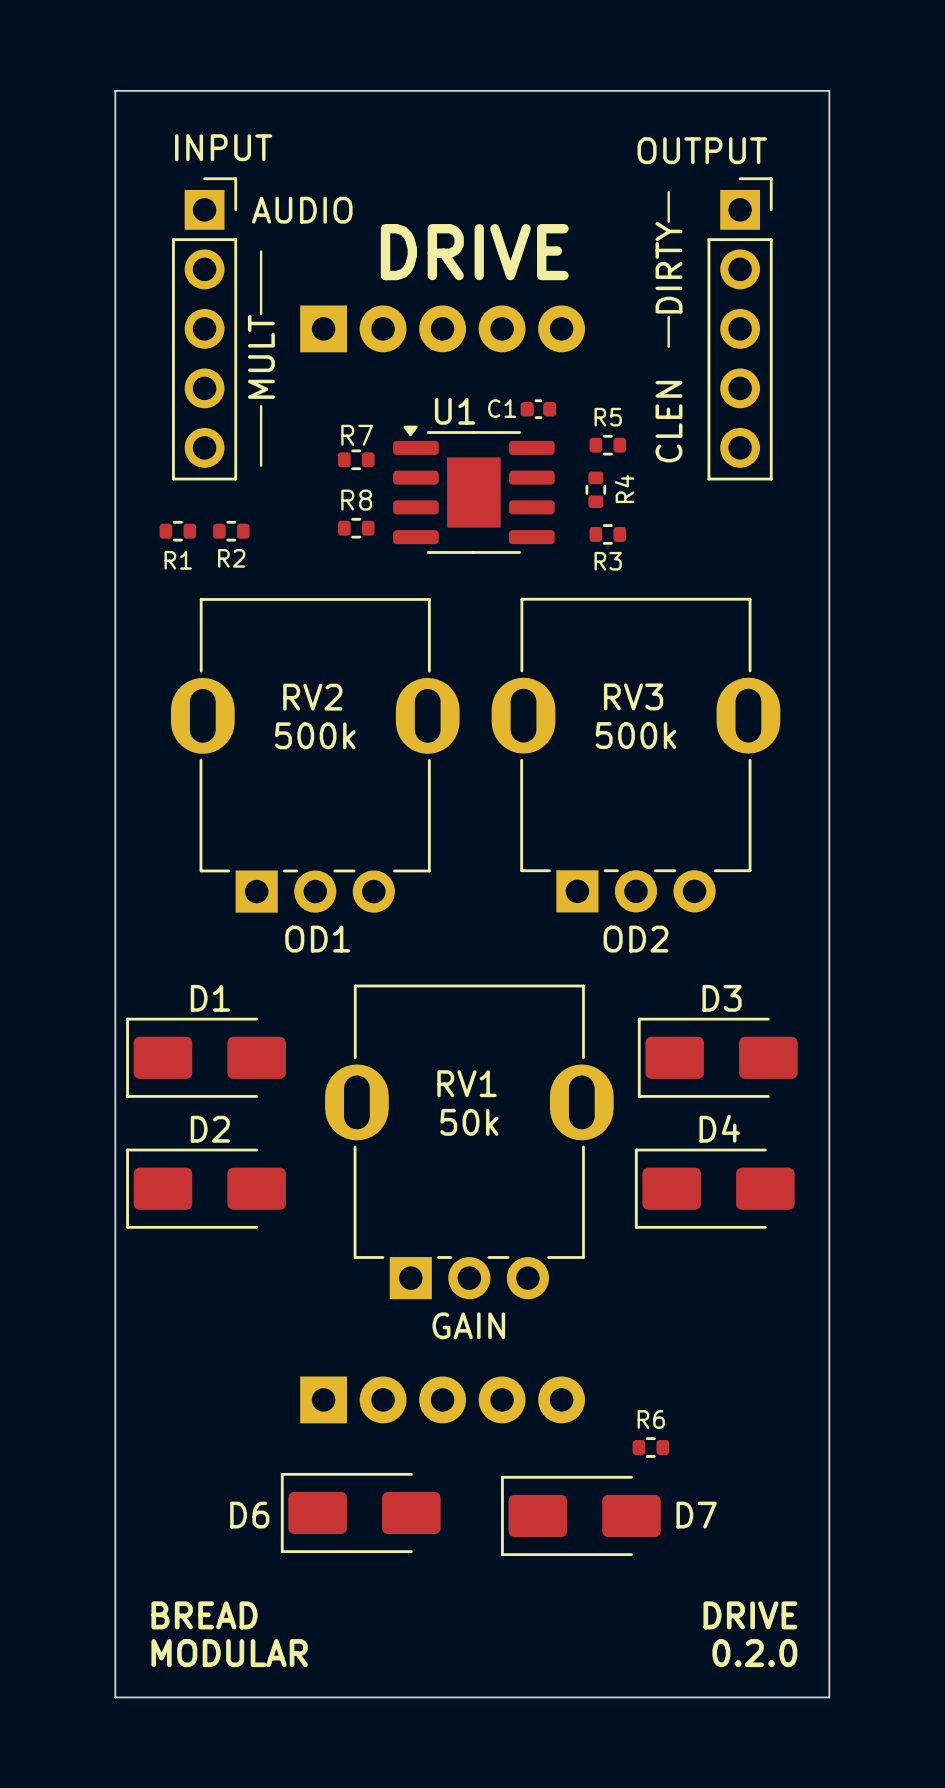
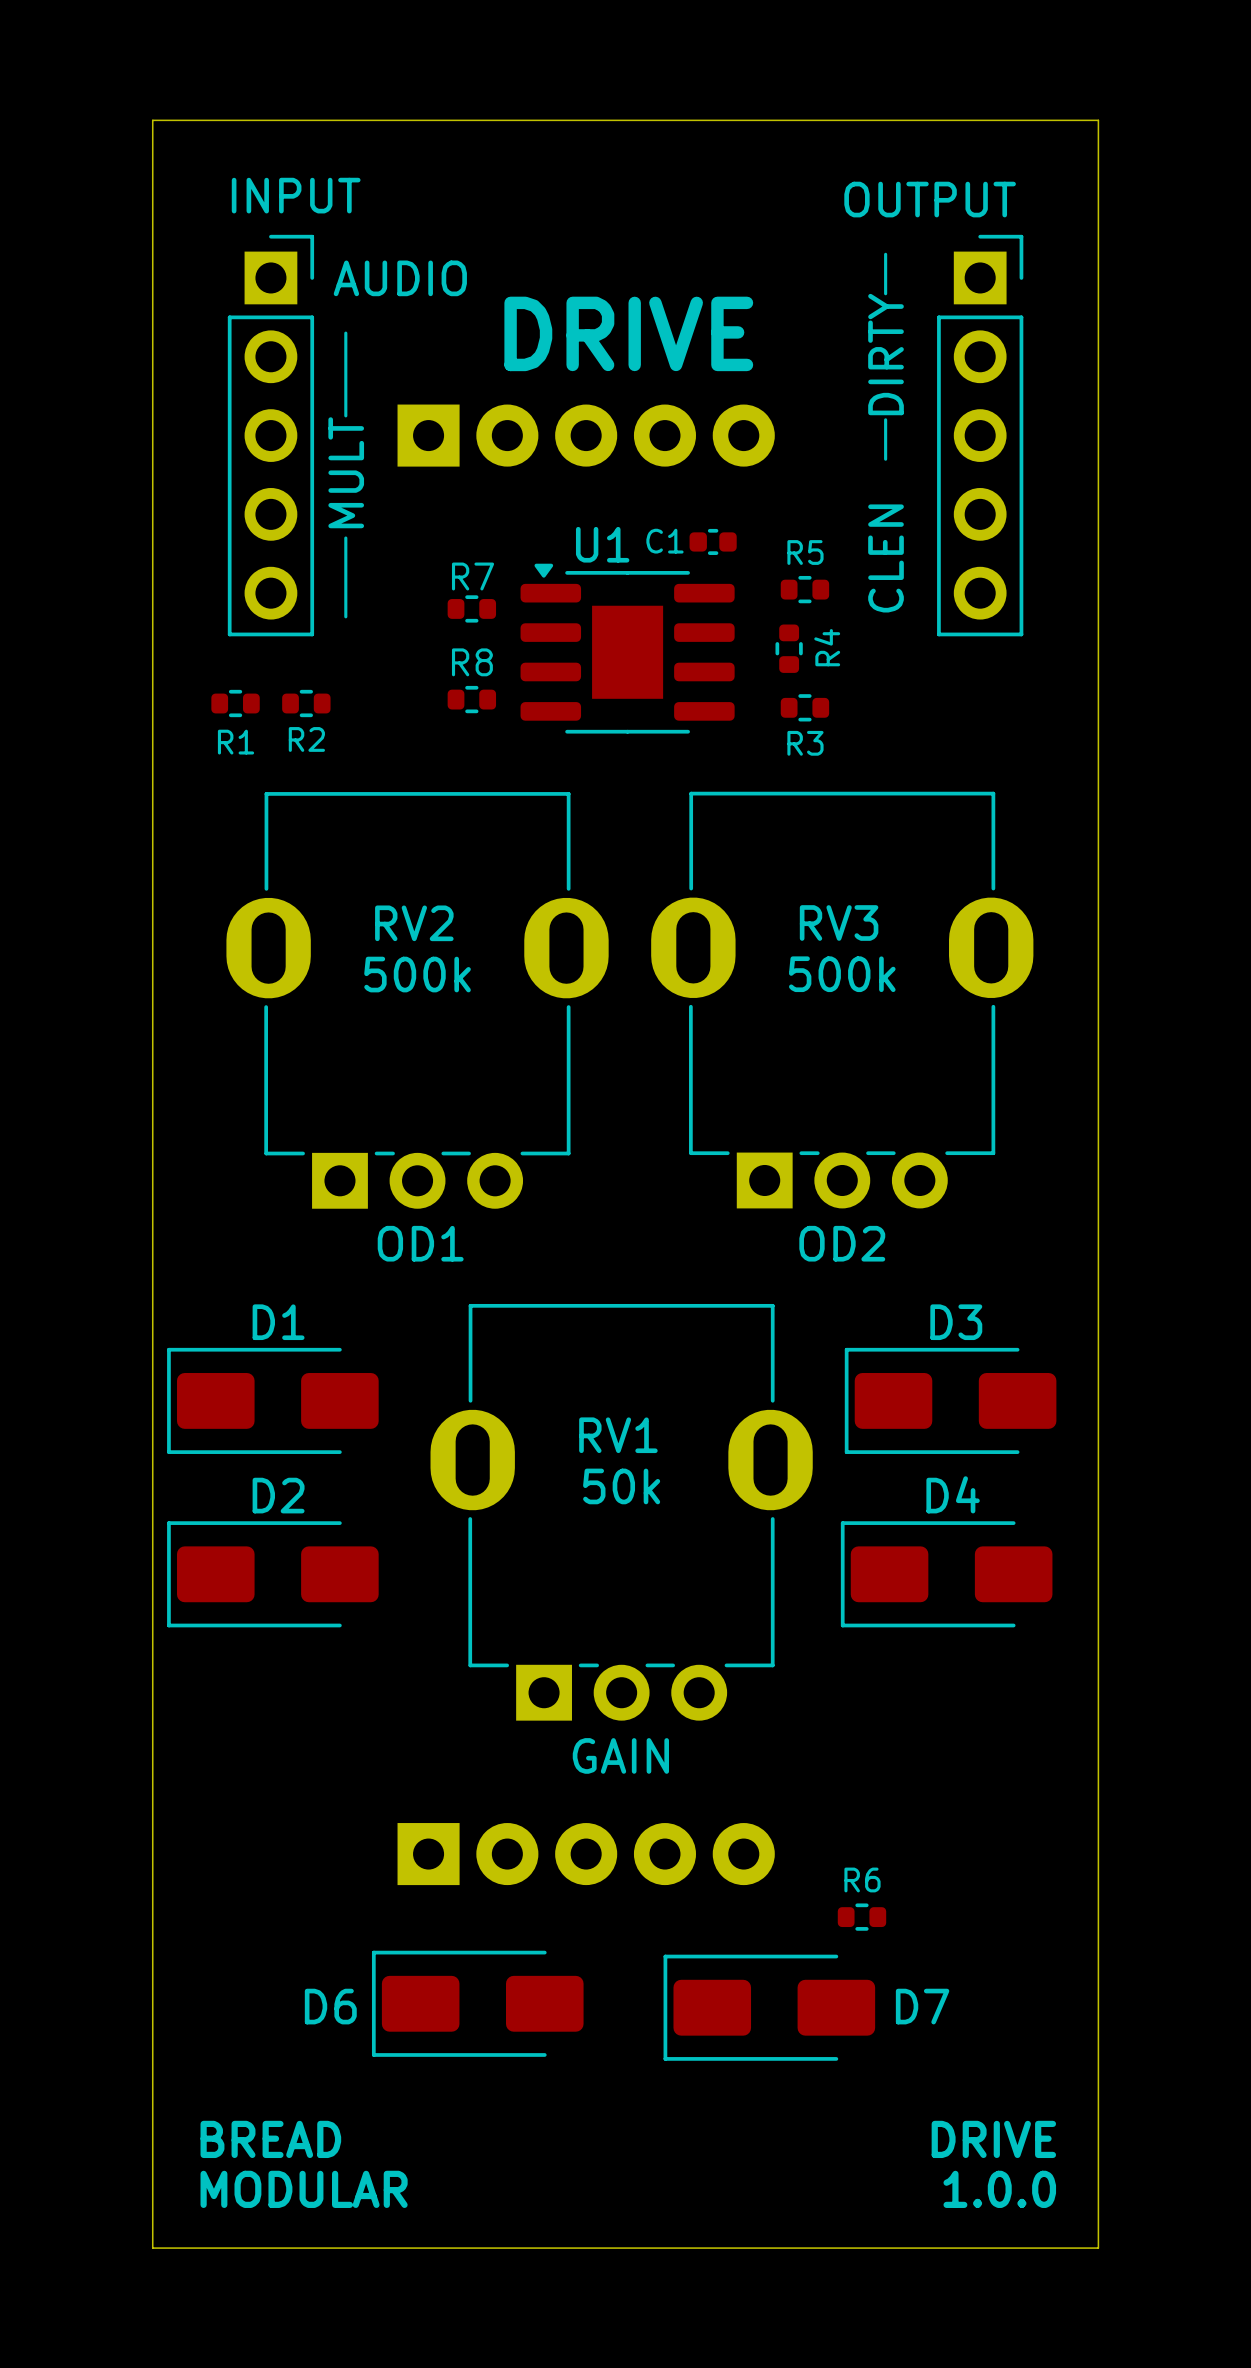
text: 0.2.0 (754, 1653) -> 1.0.0 (999, 2189)

